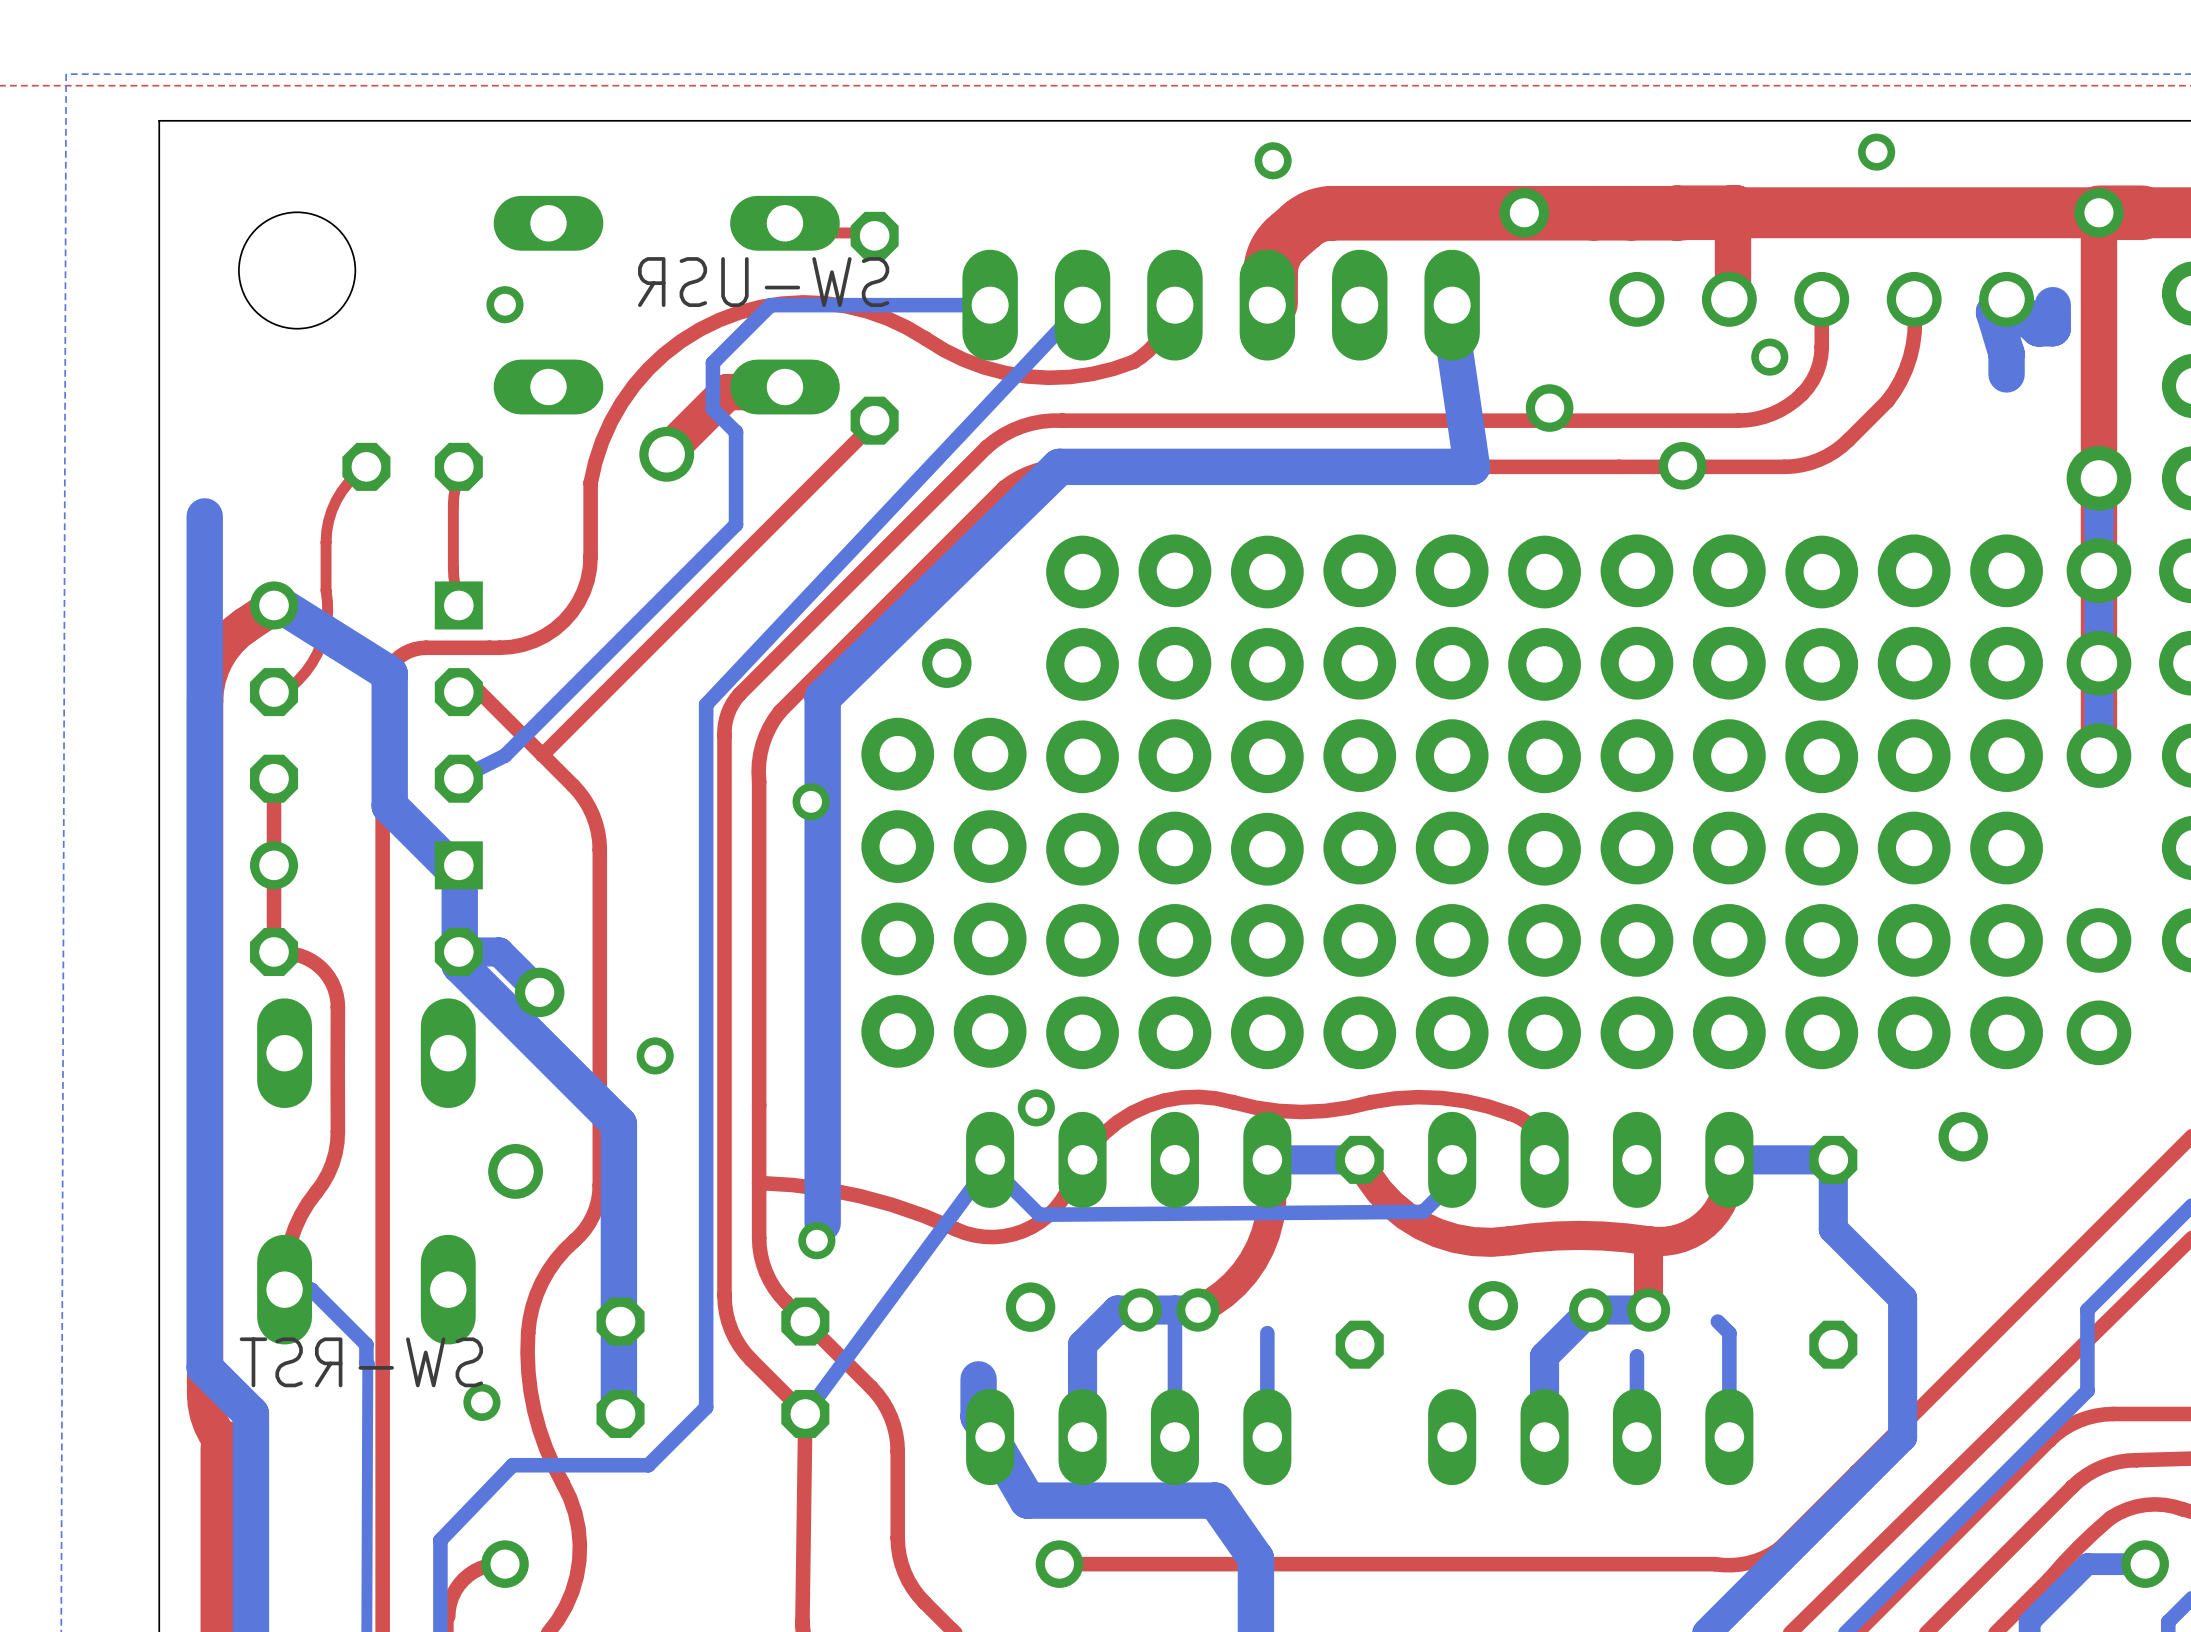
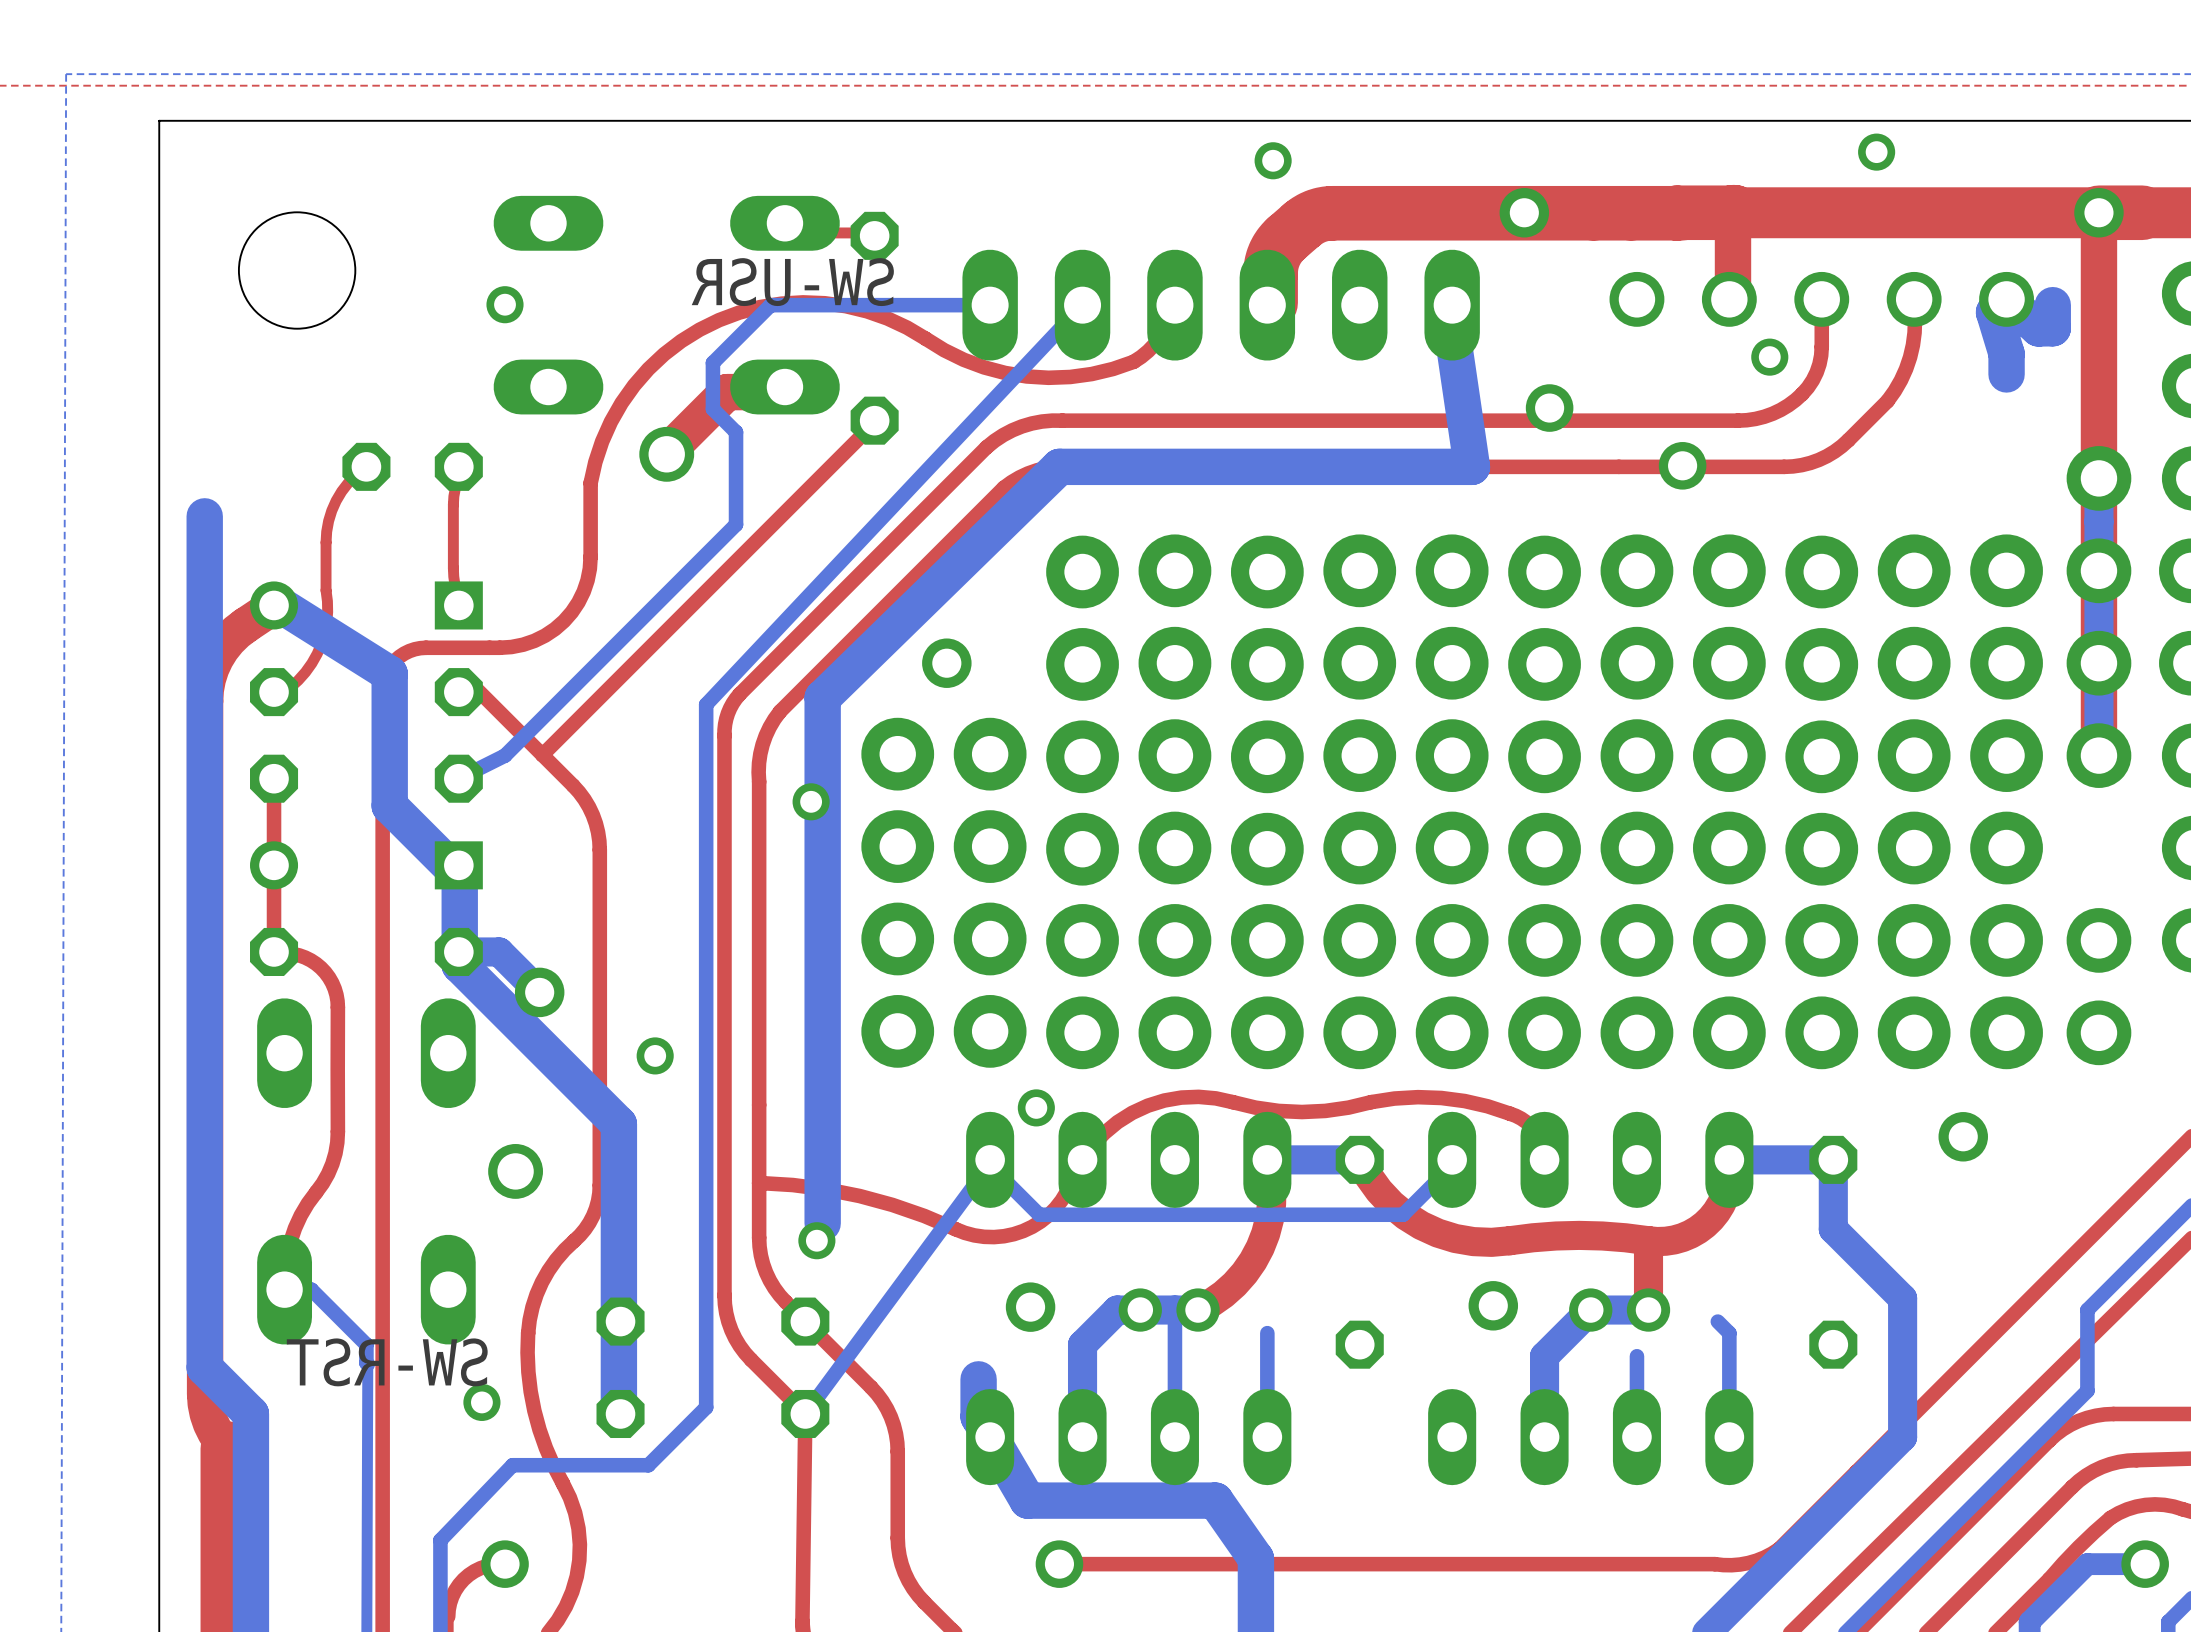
bottom track: (1452, 1159) (1460, 1174) (1423, 1211) (1039, 1214) -> (1452, 1159) (1443, 1174) (1403, 1214) (1039, 1214)

